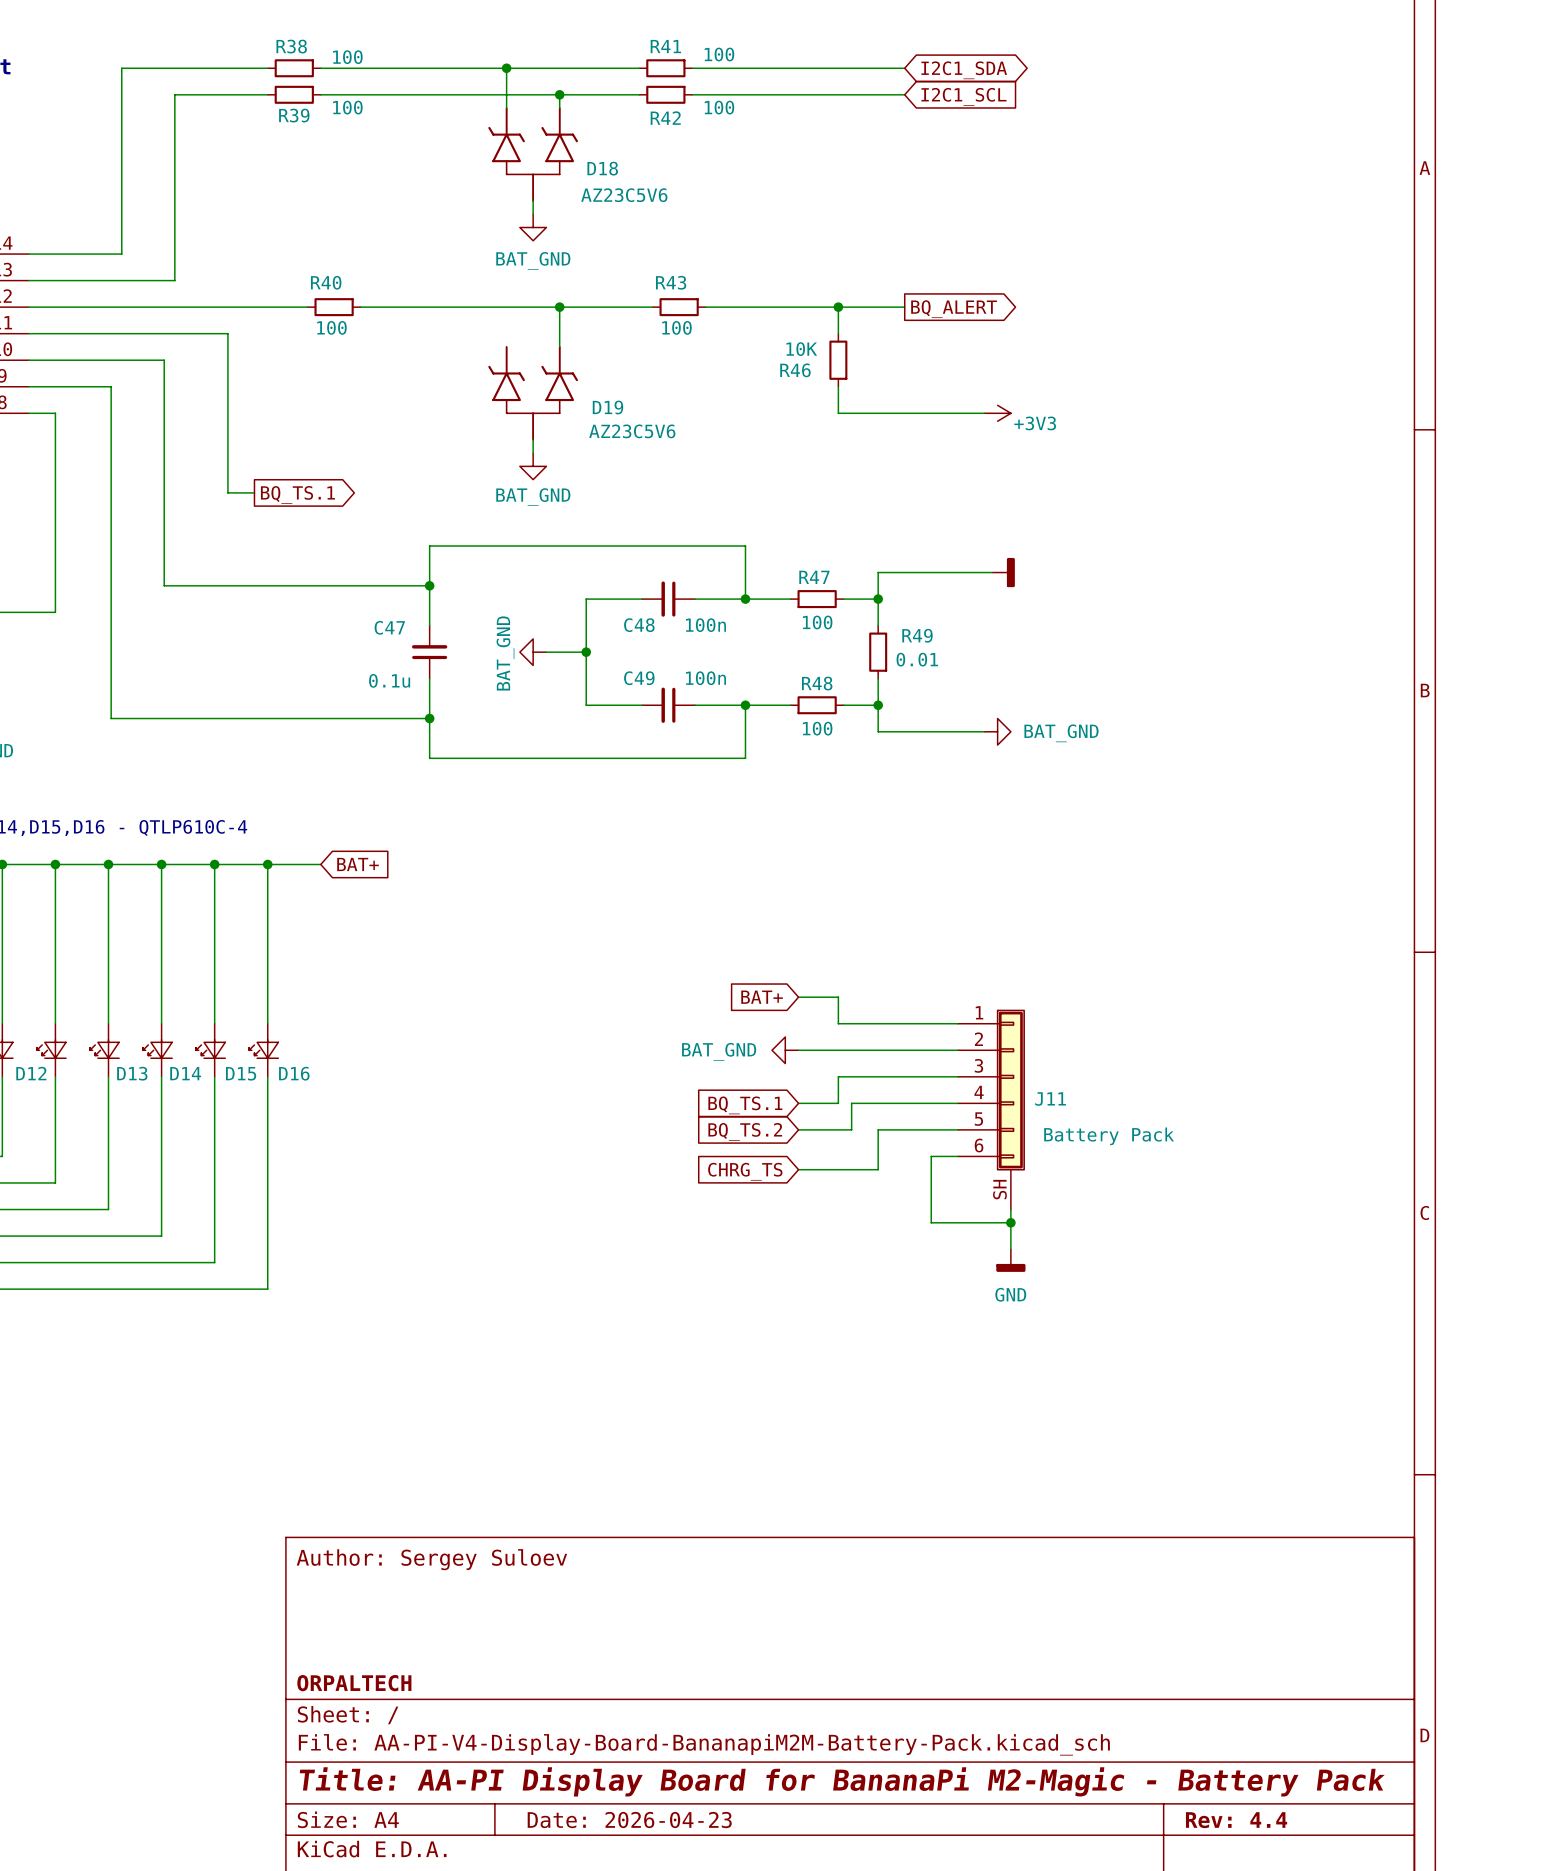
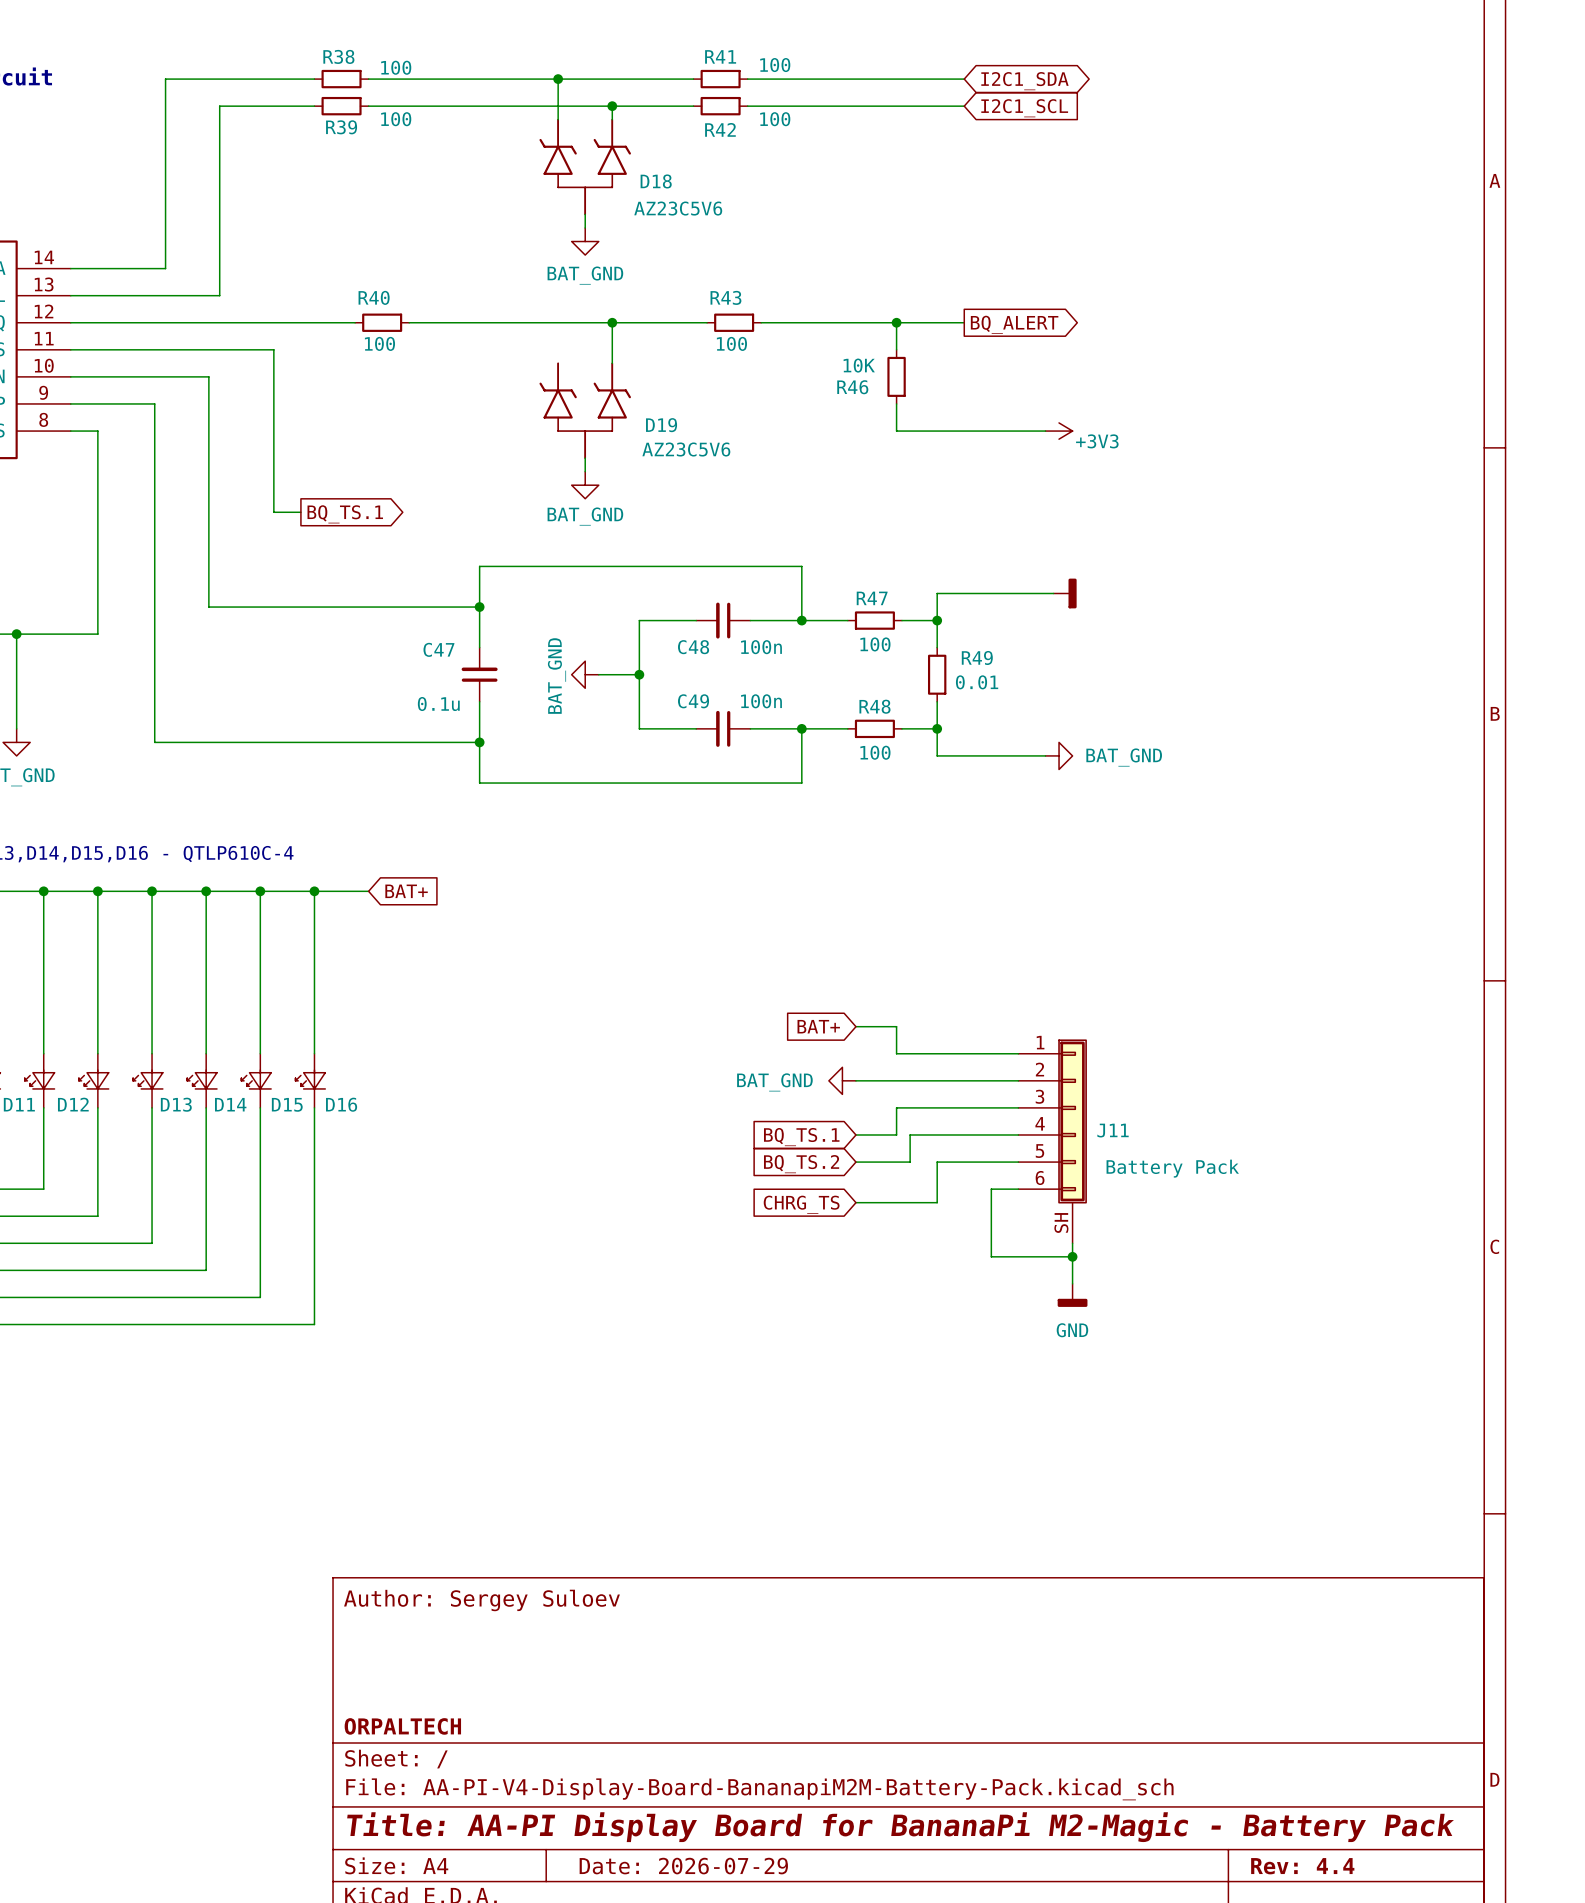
title block: Date: 2026-04-23 (629, 1820) -> Date: 2026-07-29 (683, 1866)

